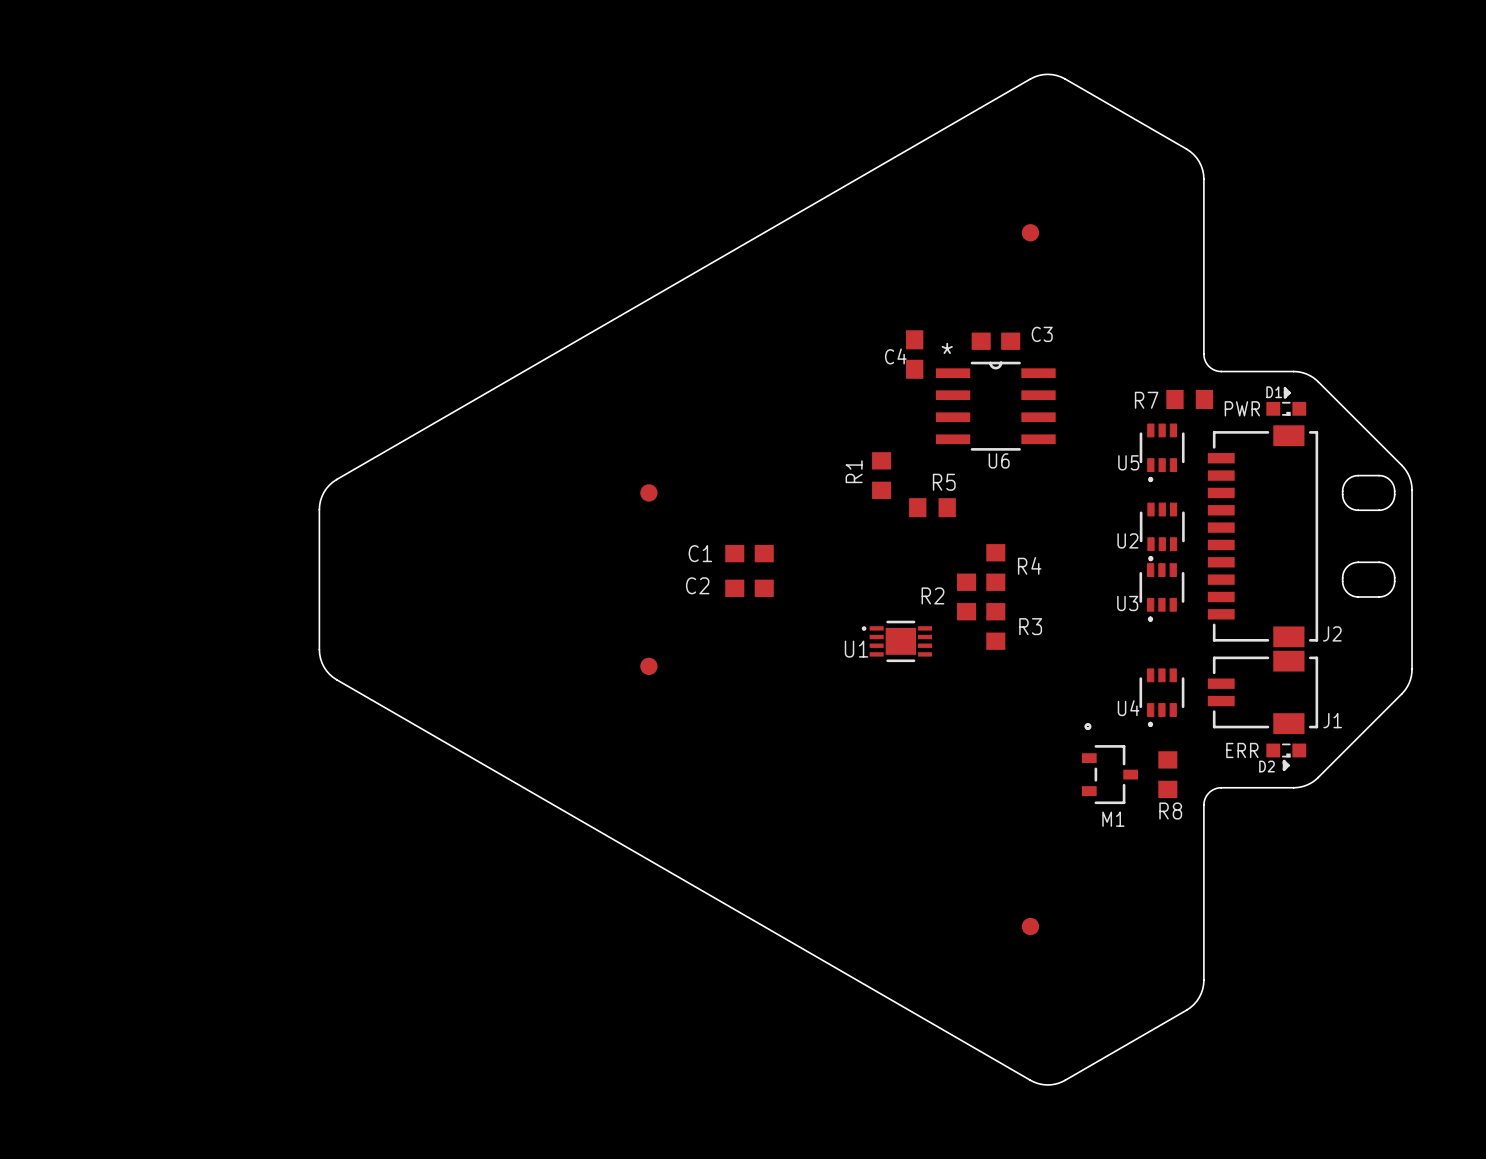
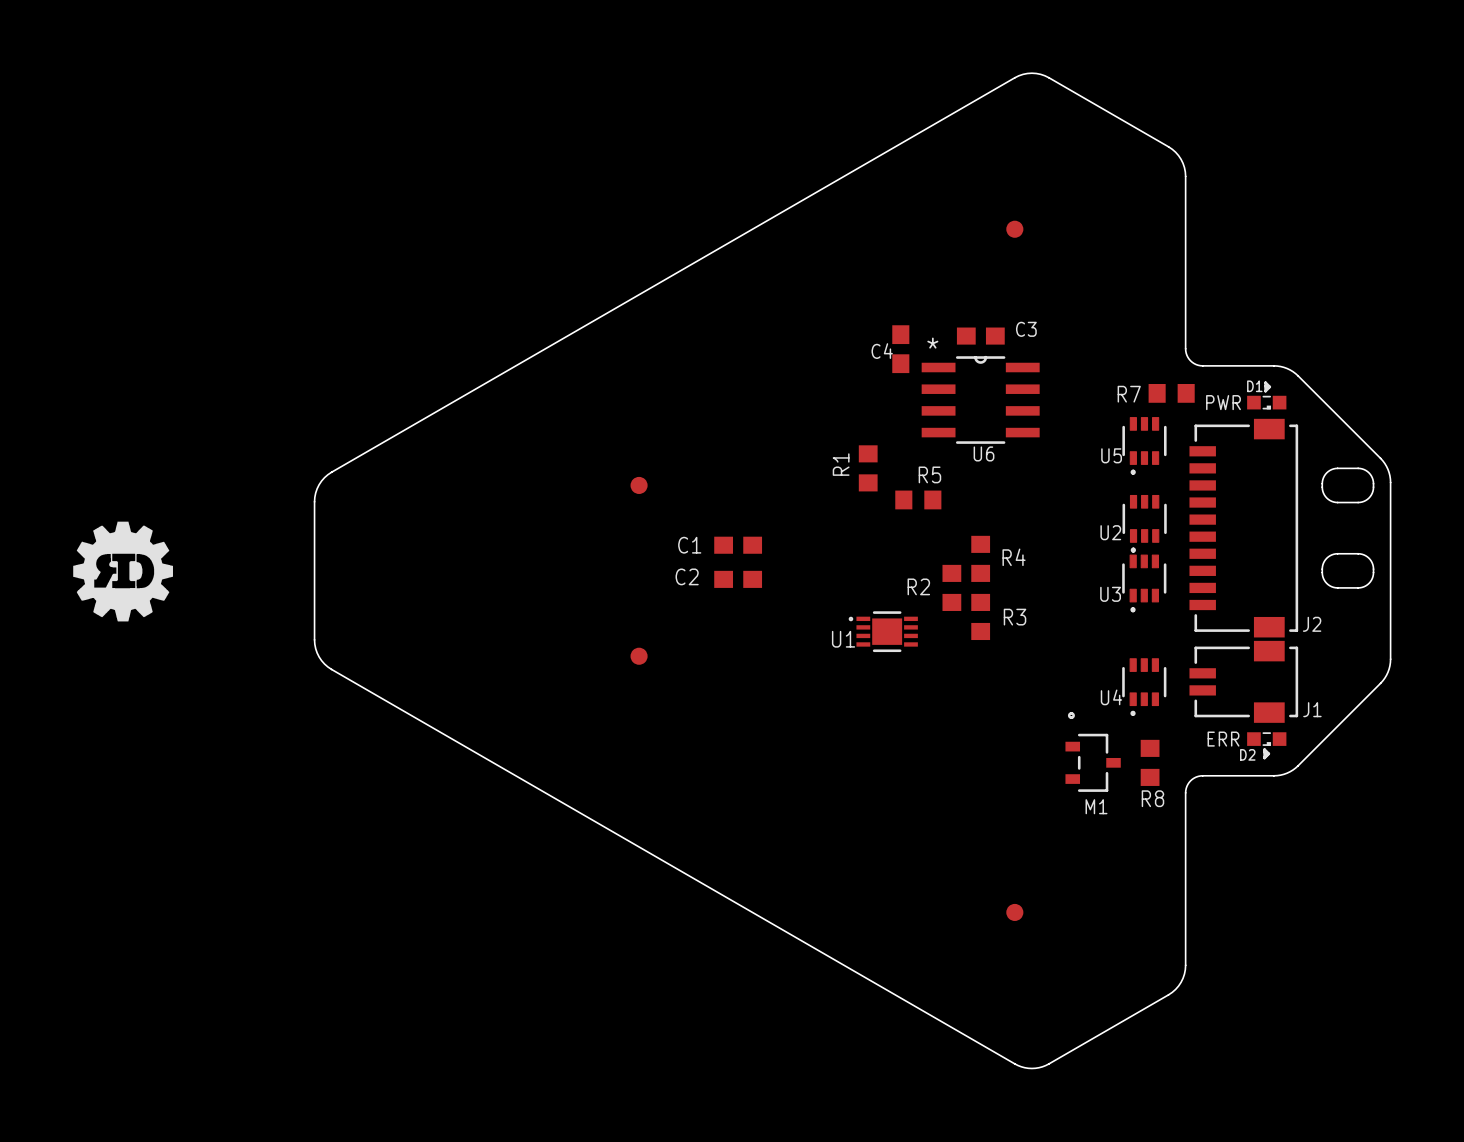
drawing: none -> [73, 521, 173, 622]

